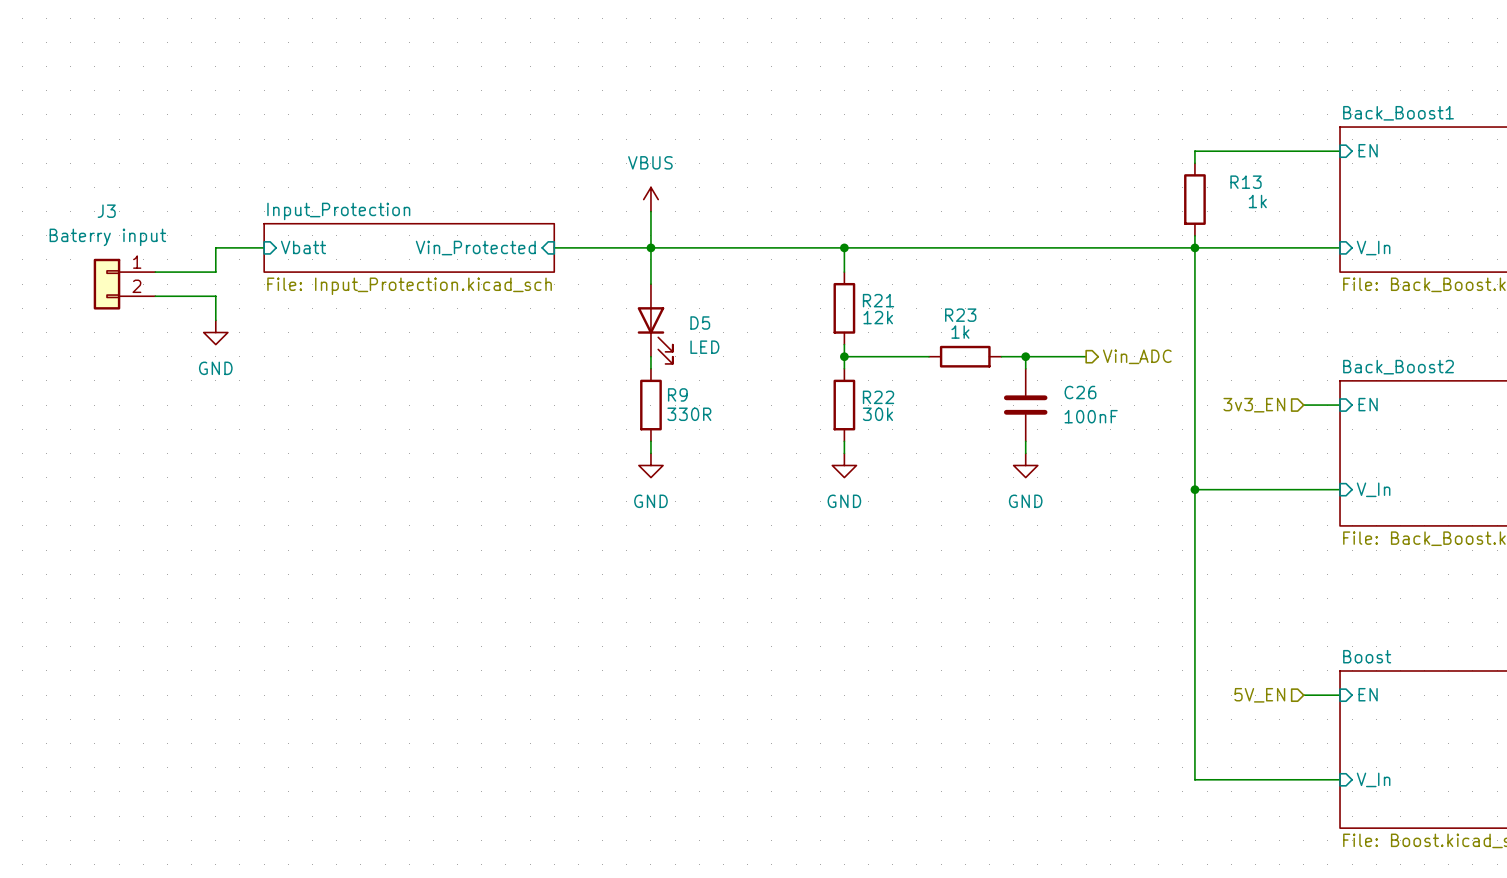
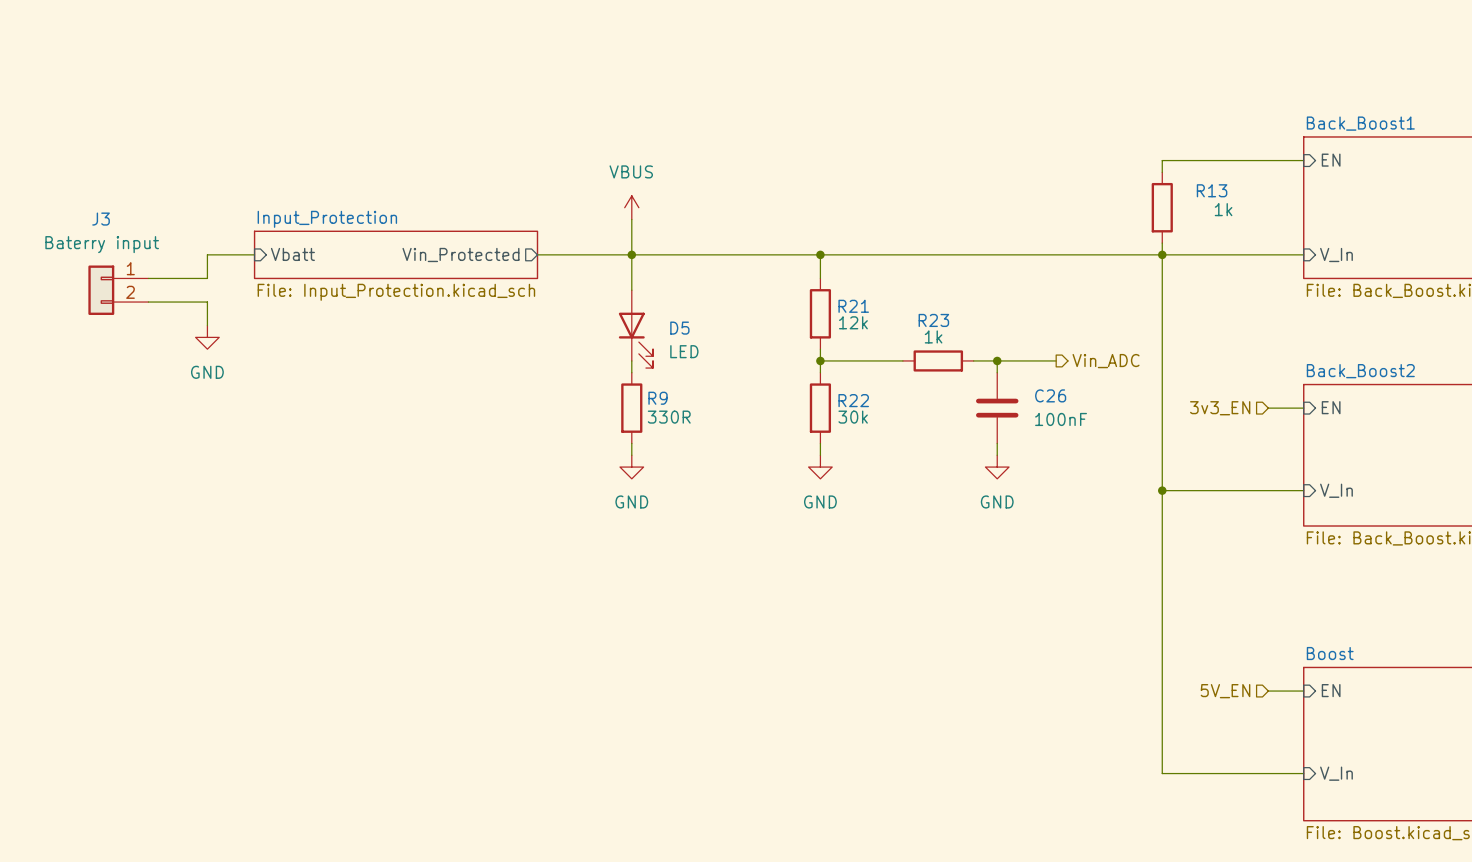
sheet pin shape: input (475, 248) -> output (460, 254)

